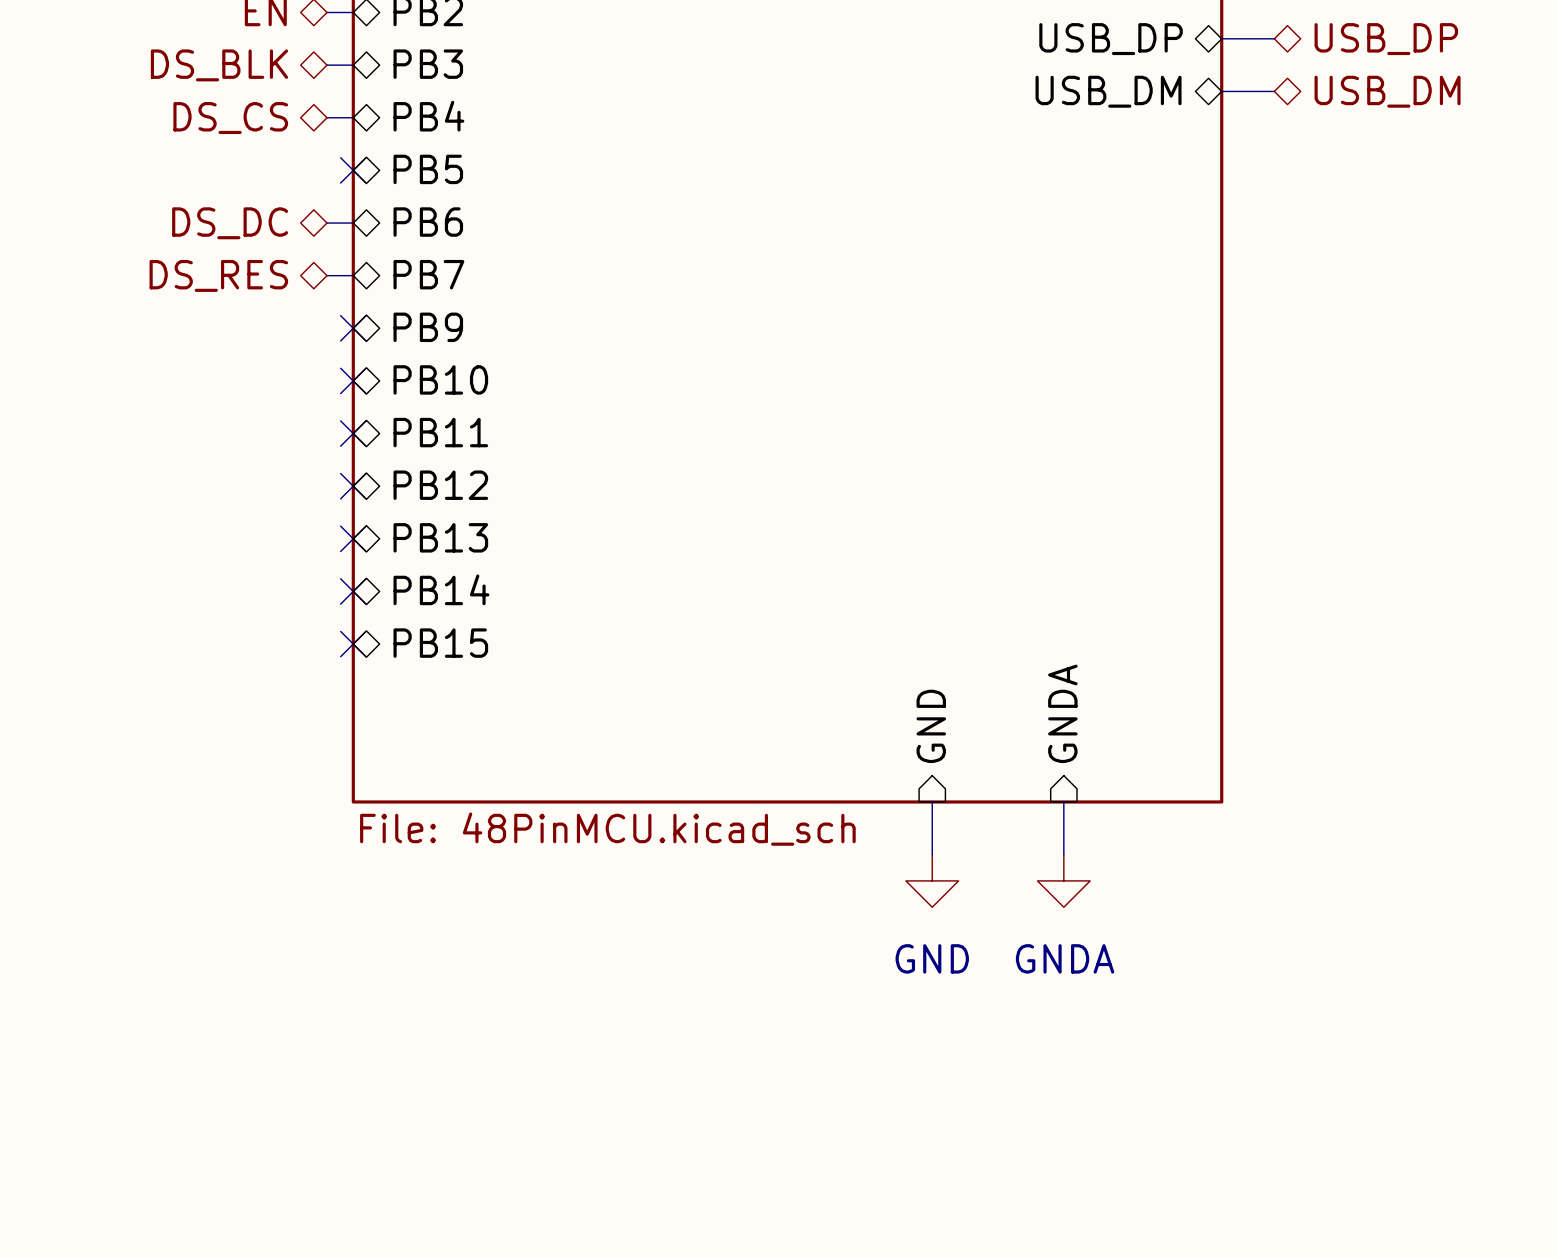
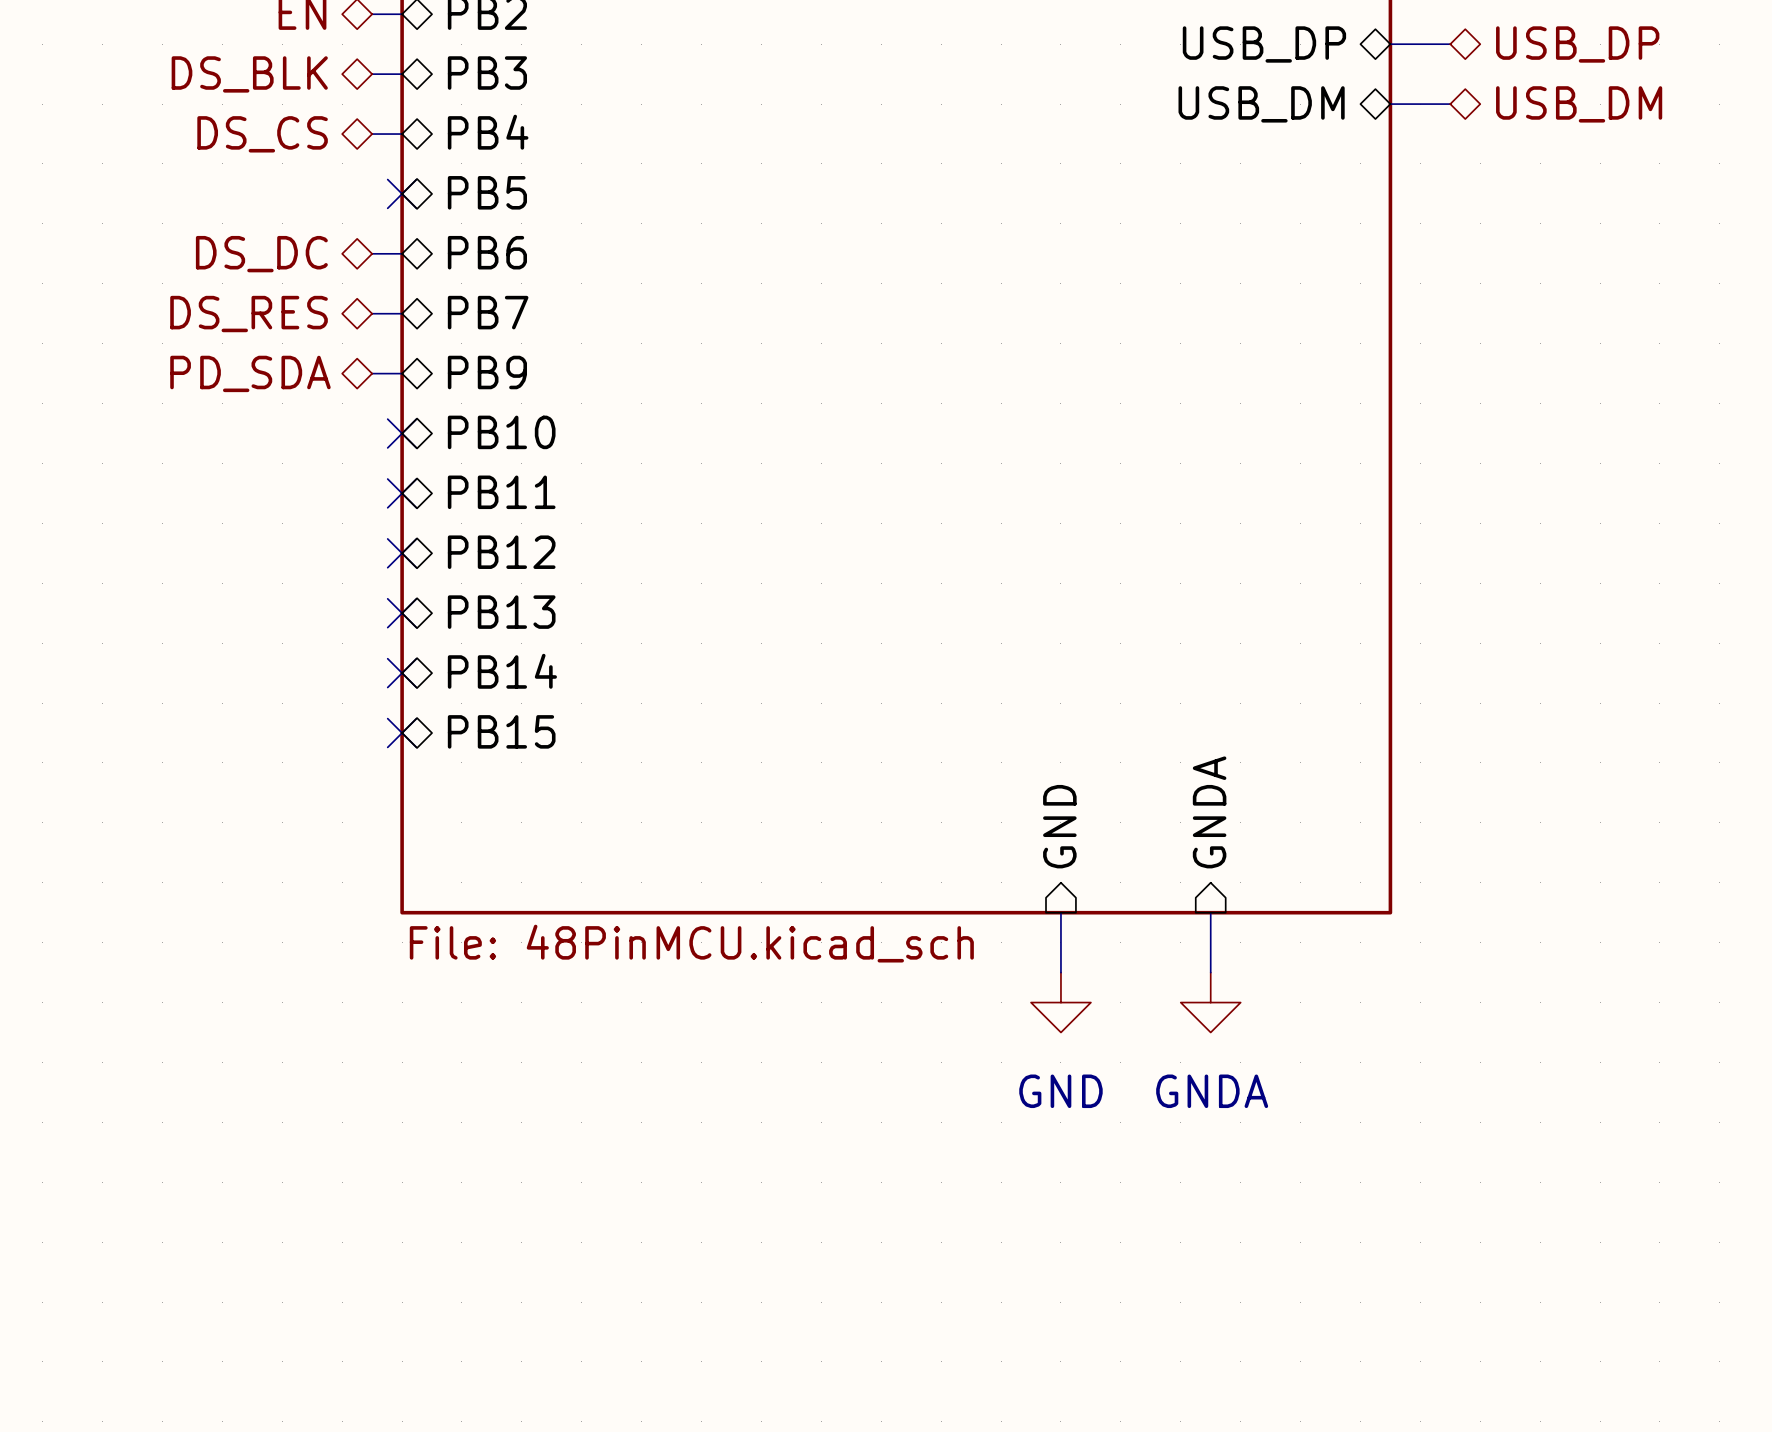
hierarchical label: none -> PD_SDA (250, 373)
wire: none -> (372, 373) (402, 373)
no-connect mark: (353, 328) -> none

